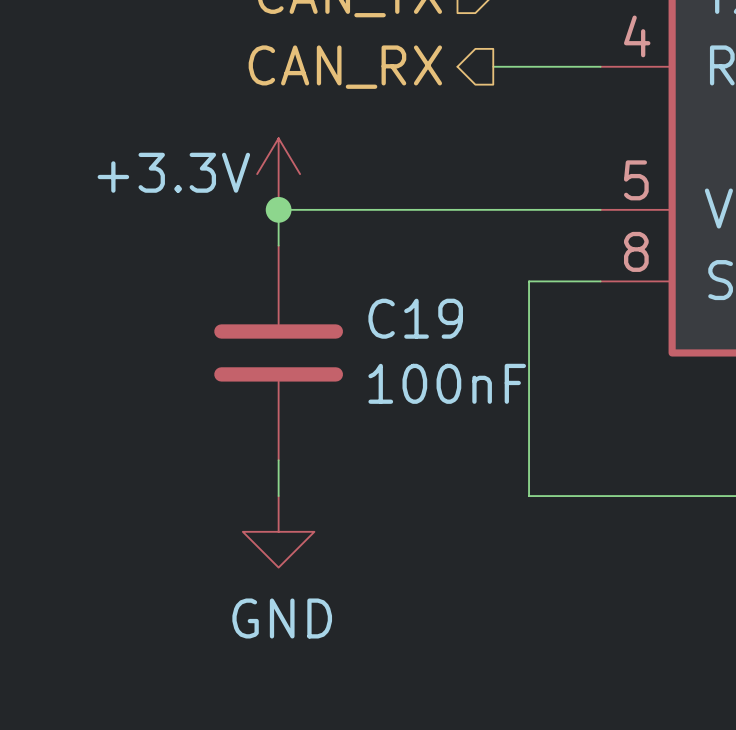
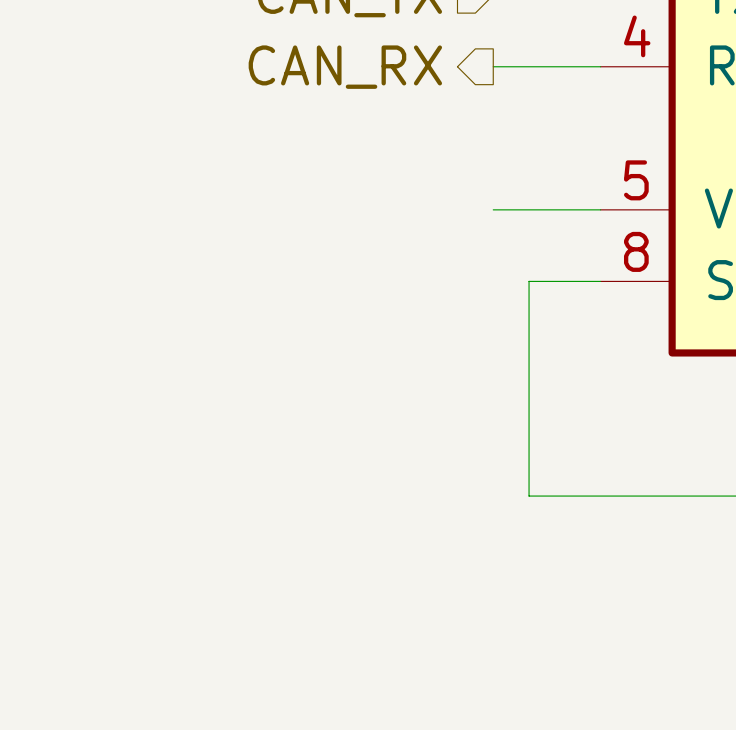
power symbol: +3.3V (278, 174) -> none
junction: (278, 209) -> none
wire: (493, 209) (278, 209) (278, 245) -> none
C19: 100nF (278, 352) -> none
wire: (278, 460) (278, 496) -> none
power symbol: GND (278, 531) -> none

